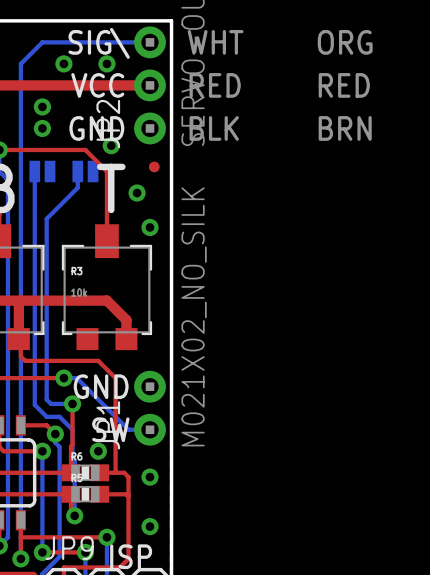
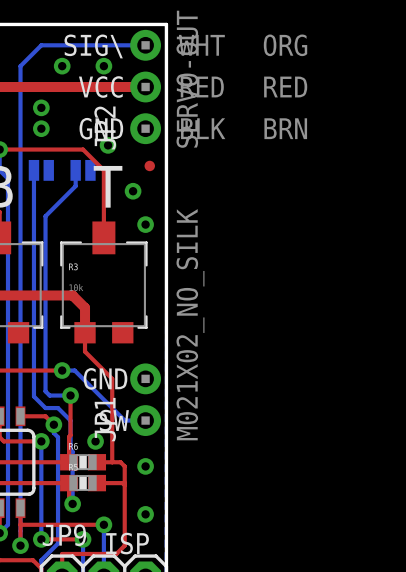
text position: ORG (345, 42) -> ORG (285, 45)
text position: RED (344, 85) -> RED (285, 87)
text position: BRN (345, 128) -> BRN (285, 128)
top track: (20, 300) (18, 302) (18, 339) (20, 341) (20, 356) (25, 360) (98, 360) (115, 378) (115, 386) -> none
top track: (74, 300) (106, 300) (126, 320) (126, 339) (128, 341) -> (72, 295) (85, 307) (85, 351) (112, 378)

